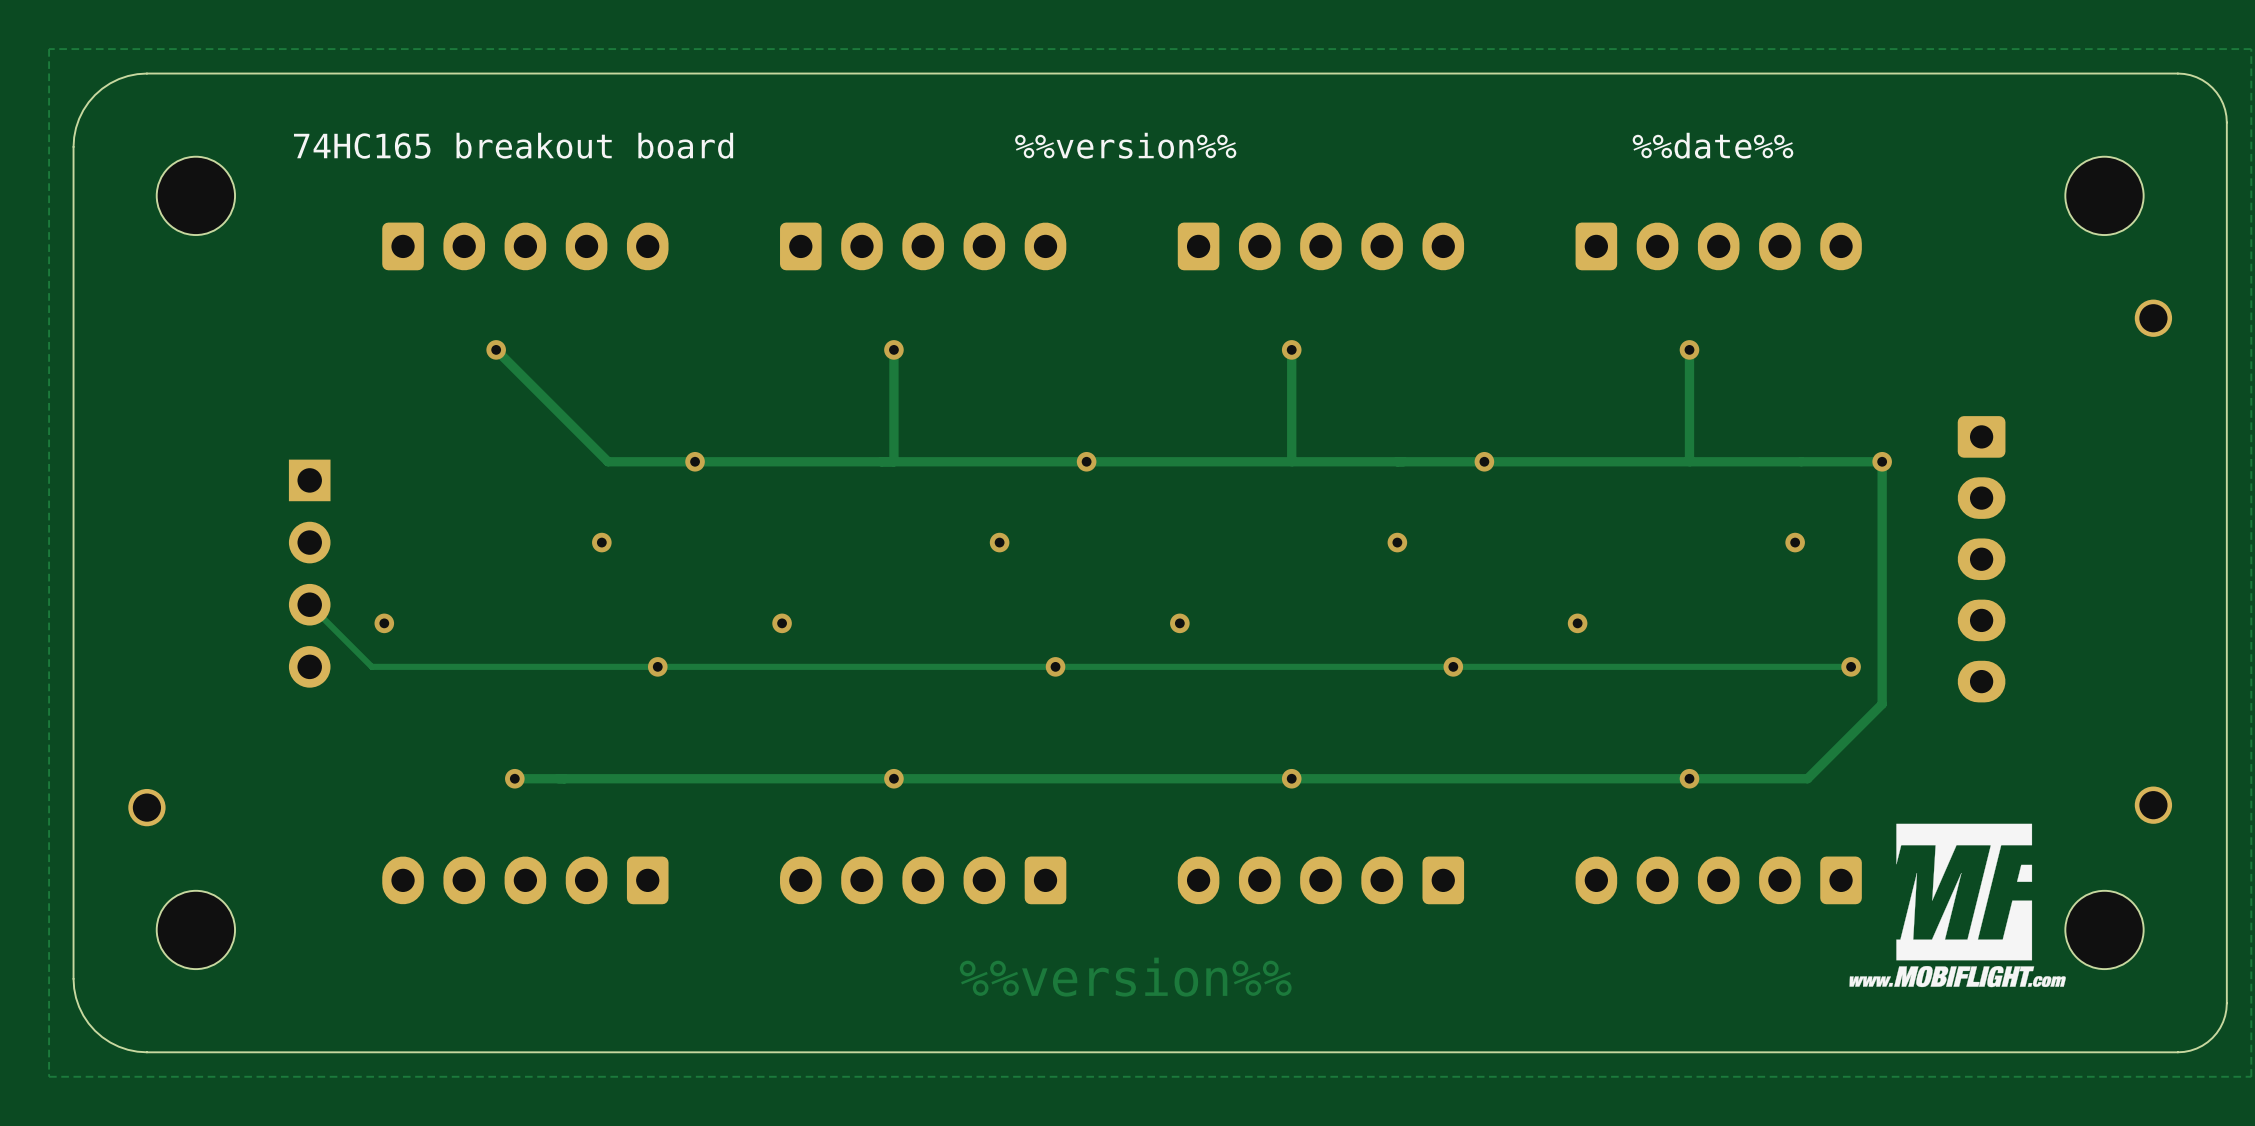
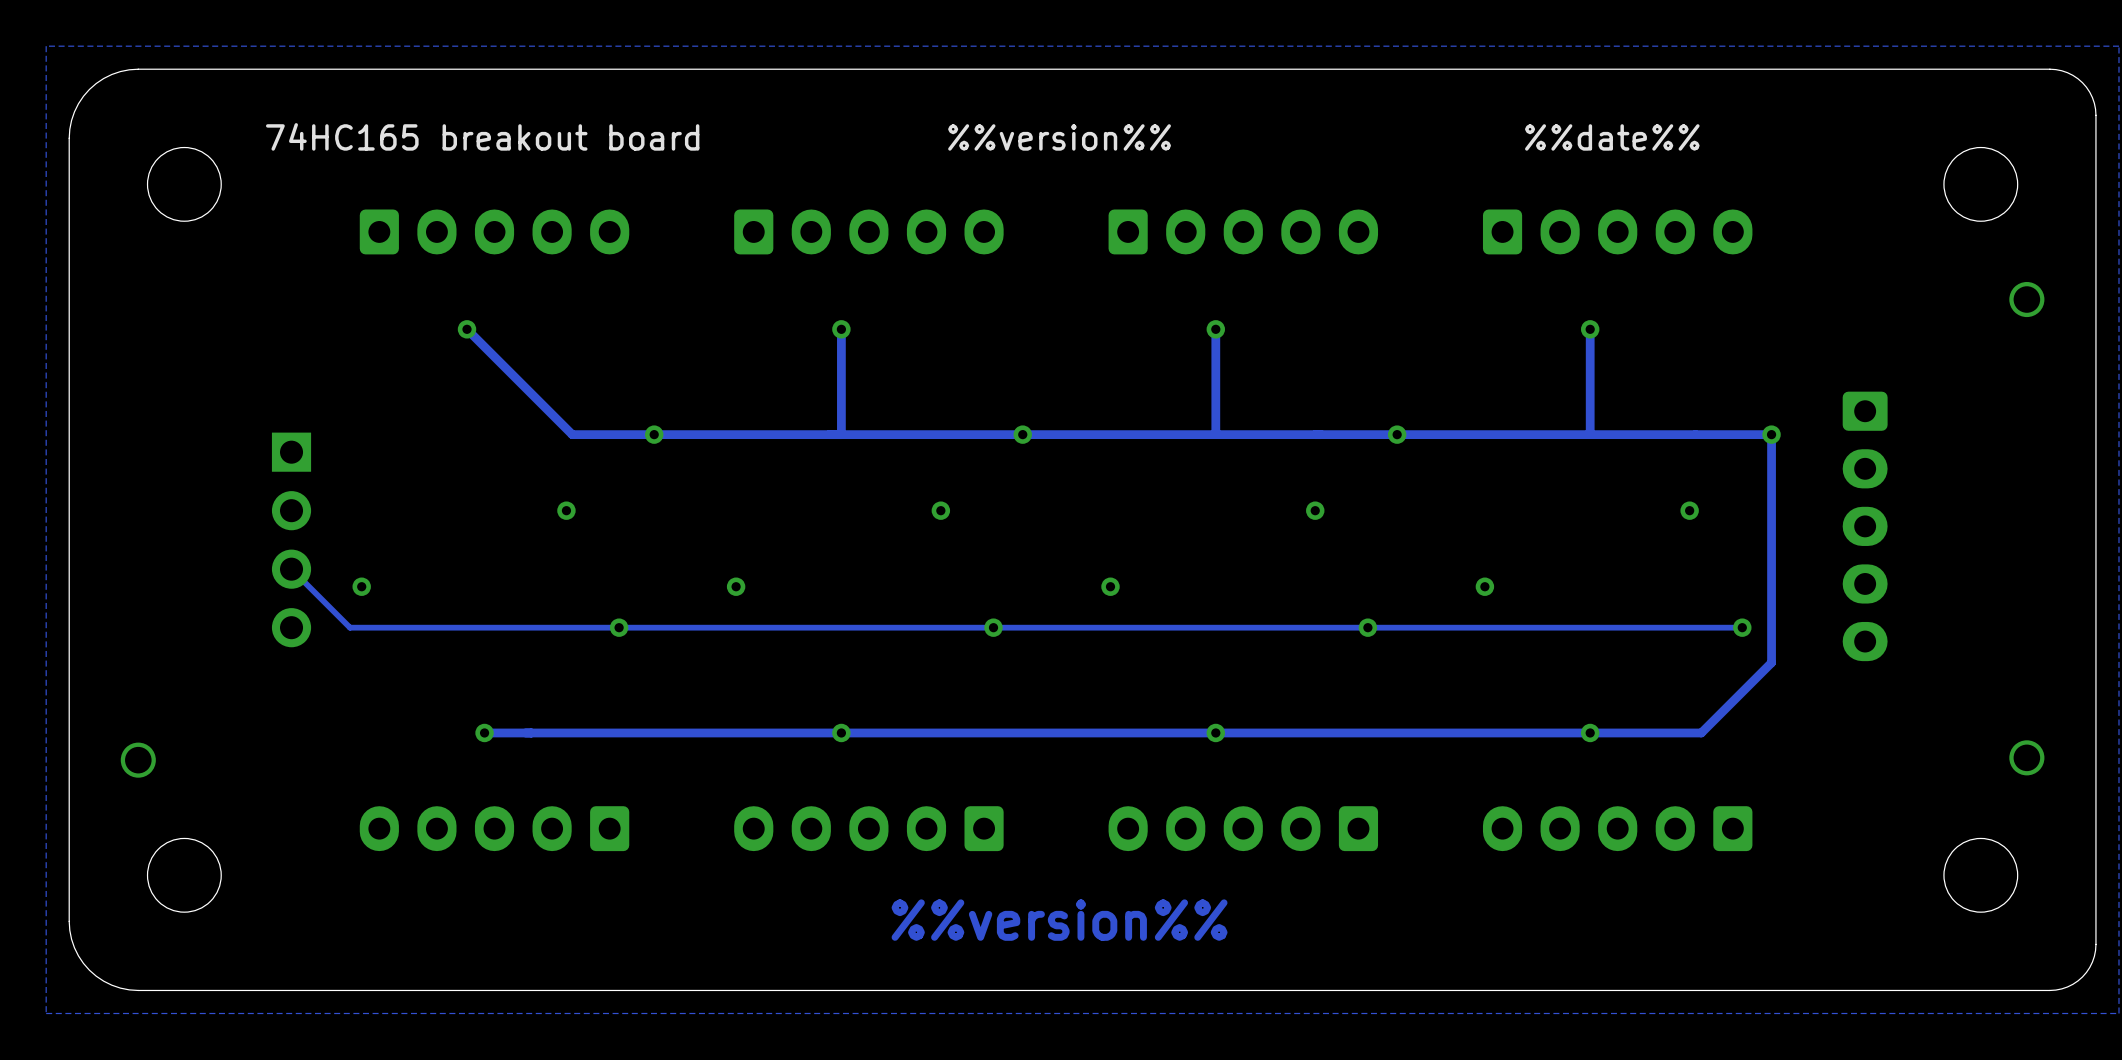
drawing: [1849, 823, 2066, 988] -> none

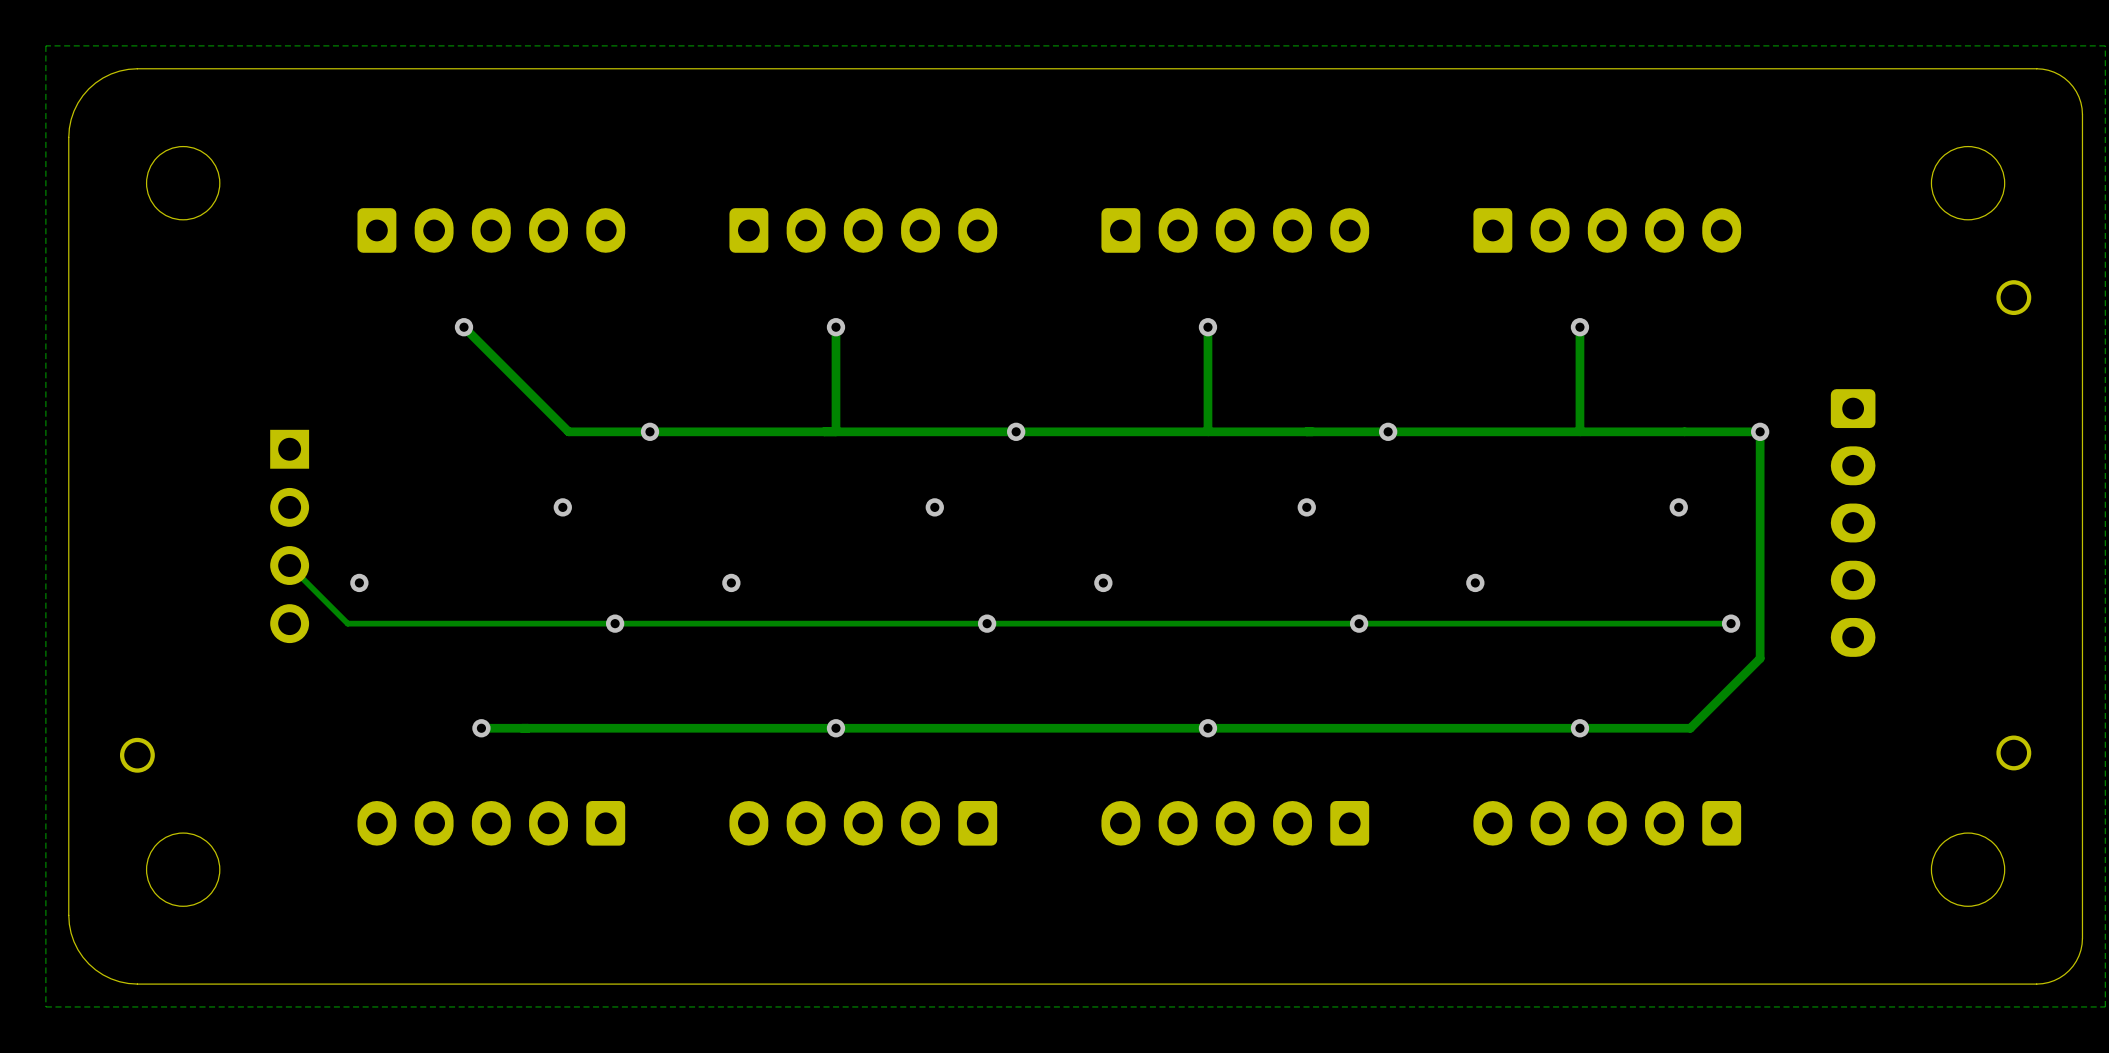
text: 74HC165 breakout board (482, 136) -> none
text: %%version%% (1059, 137) -> none
text: %%date%% (1612, 137) -> none
text: %%version%% (1059, 920) -> none

